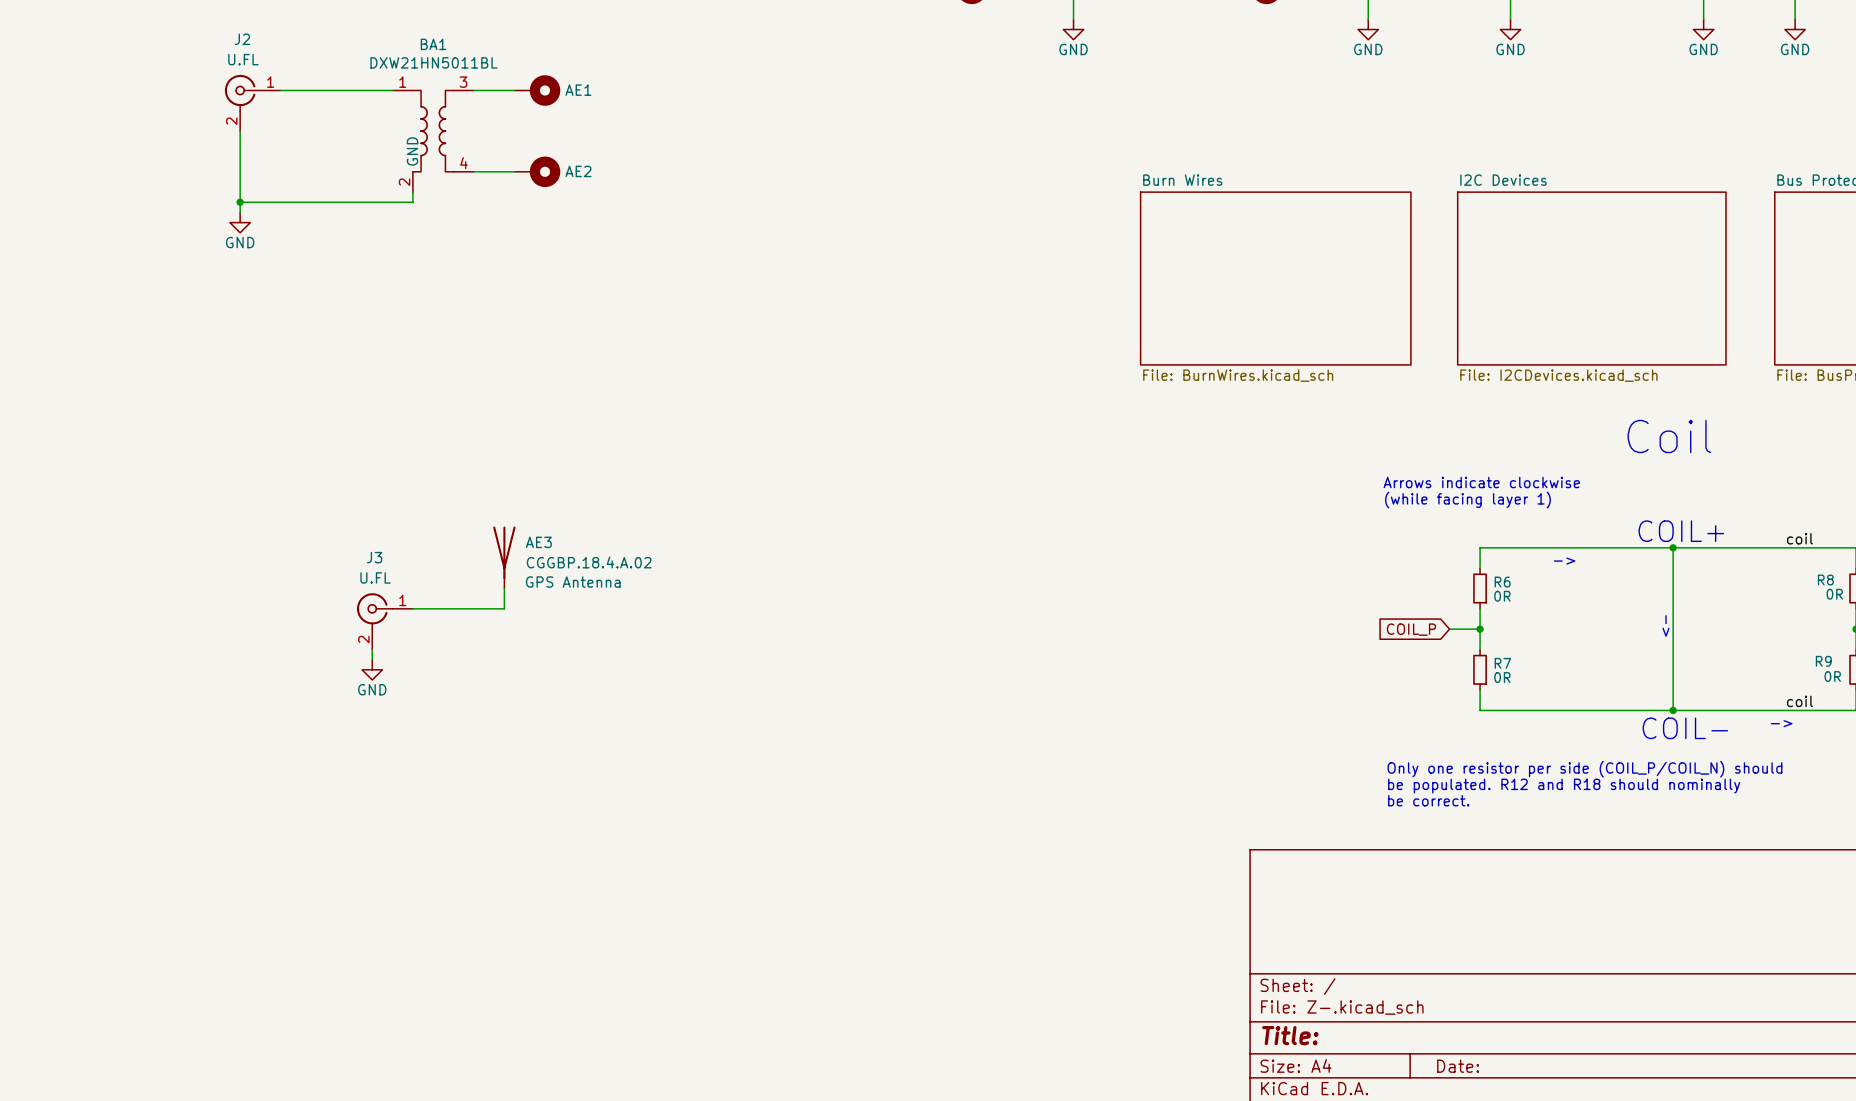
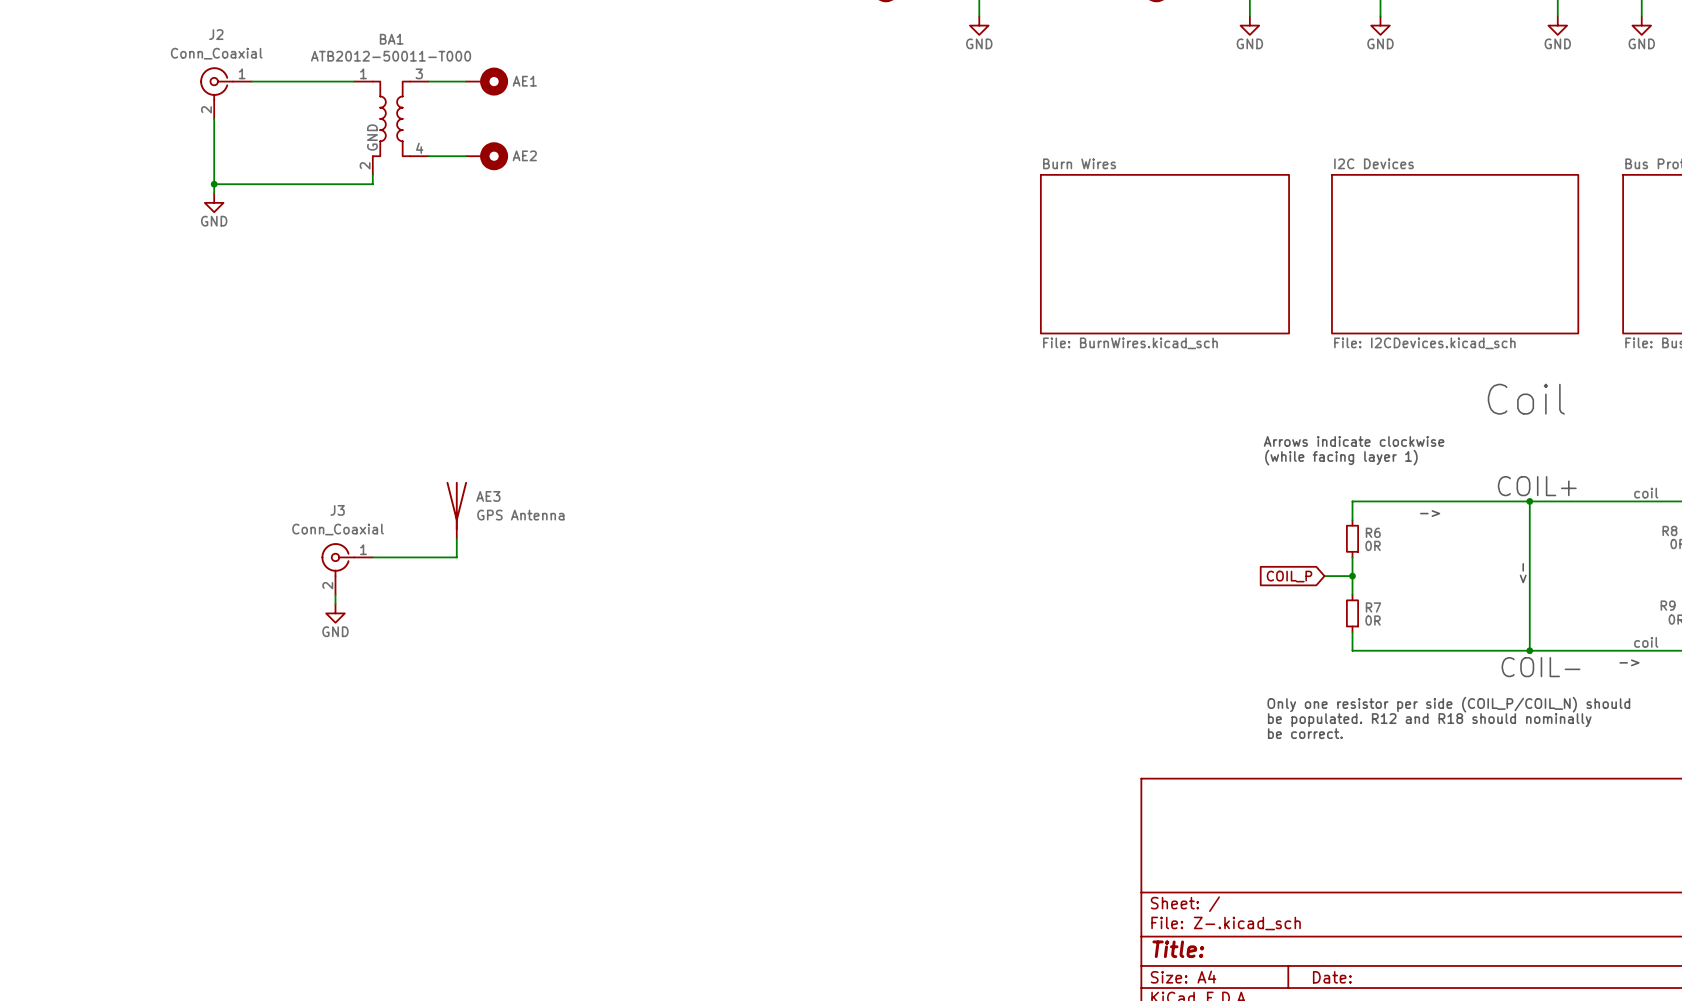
J2 value: U.FL (243, 59) -> Conn_Coaxial (216, 53)
BA1 value: DXW21HN5011BL (433, 62) -> ATB2012-50011-T000 (391, 56)
AE3 value: CGGBP.18.4.A.02 (589, 562) -> GPS Antenna (520, 515)
J3 value: U.FL (375, 577) -> Conn_Coaxial (338, 529)
AE3 text: GPS Antenna (573, 582) -> none

